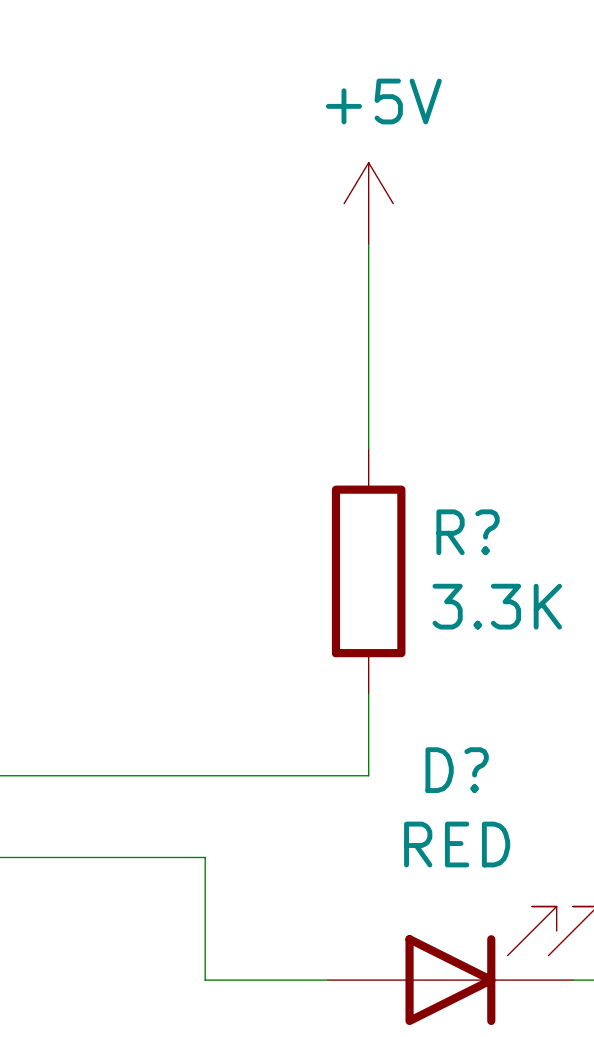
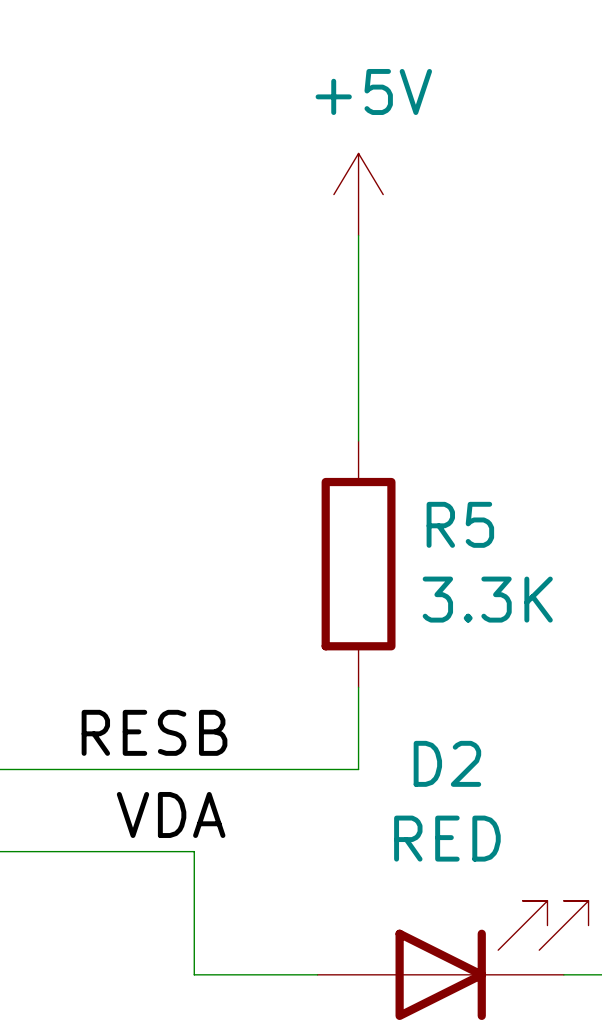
R? name: R? (468, 532) -> R5 (460, 524)
label: none -> RESB (154, 732)
D? name: D? (457, 770) -> D2 (447, 763)
label: none -> VDA (171, 814)

